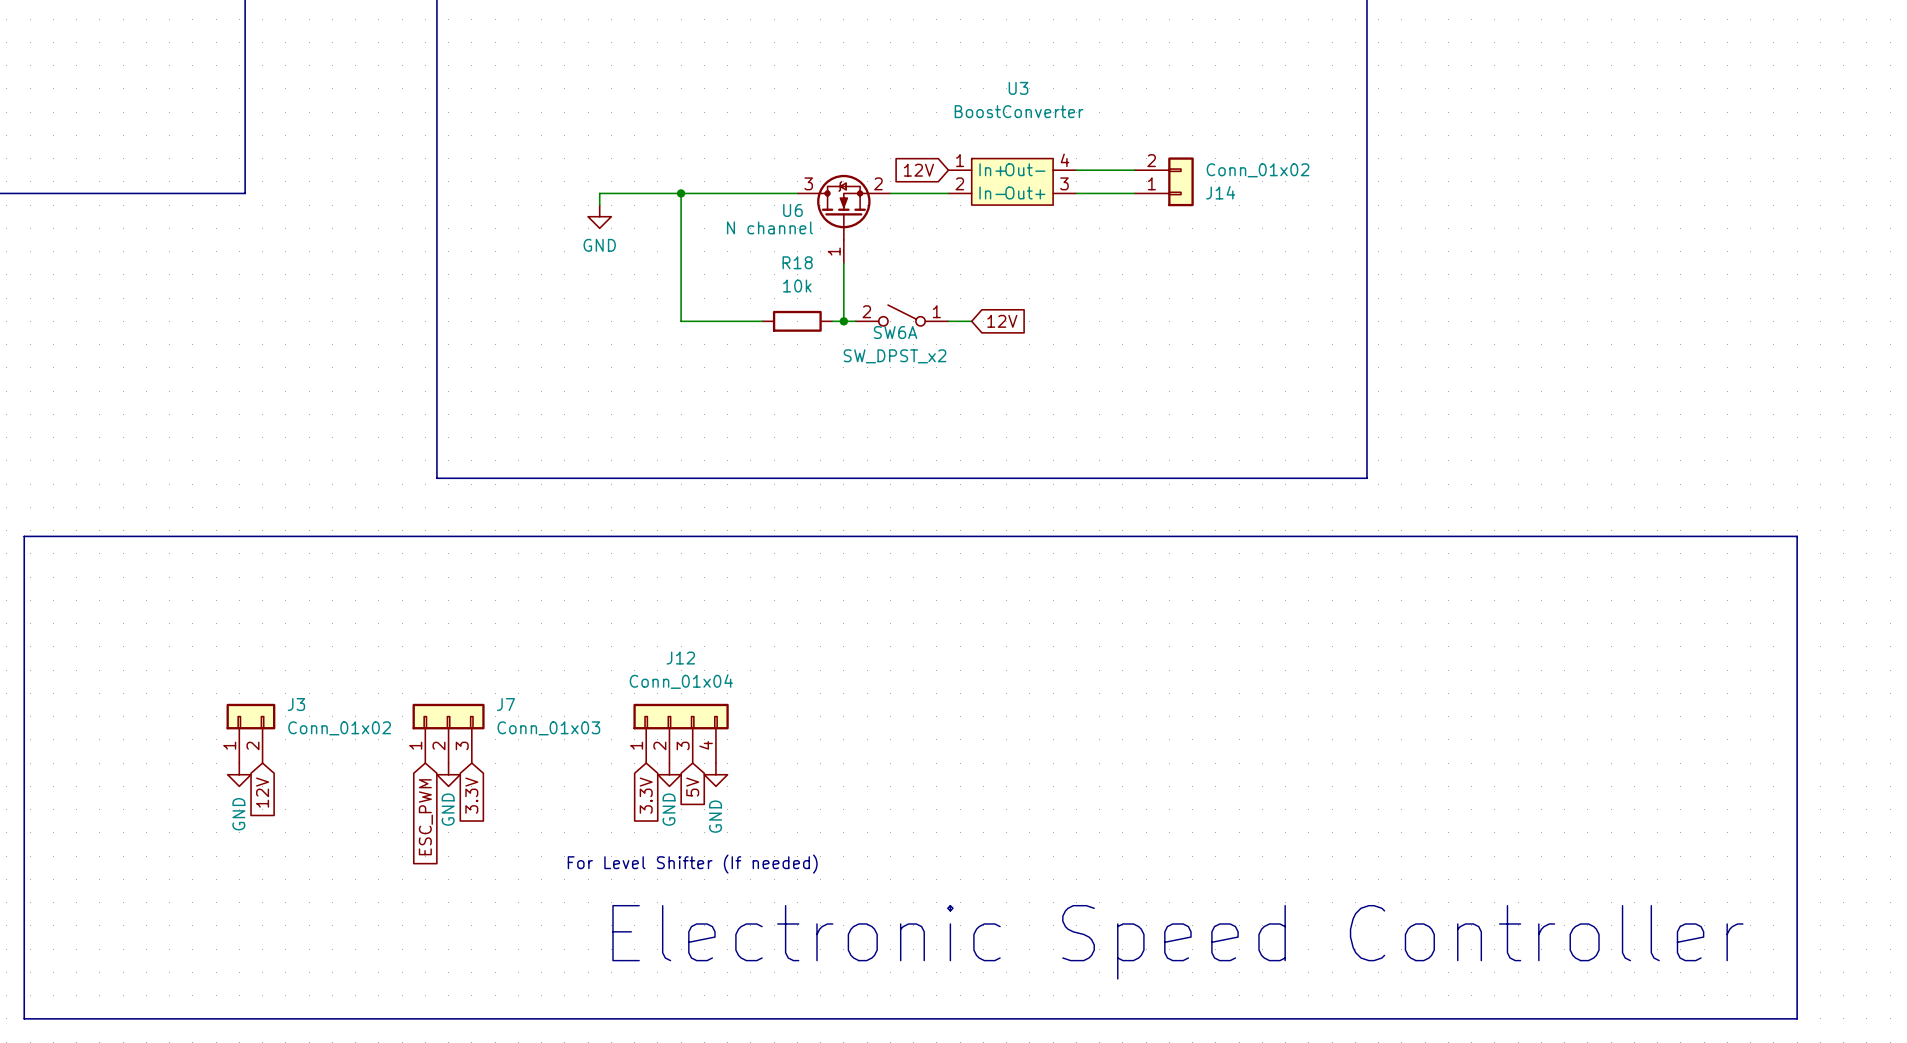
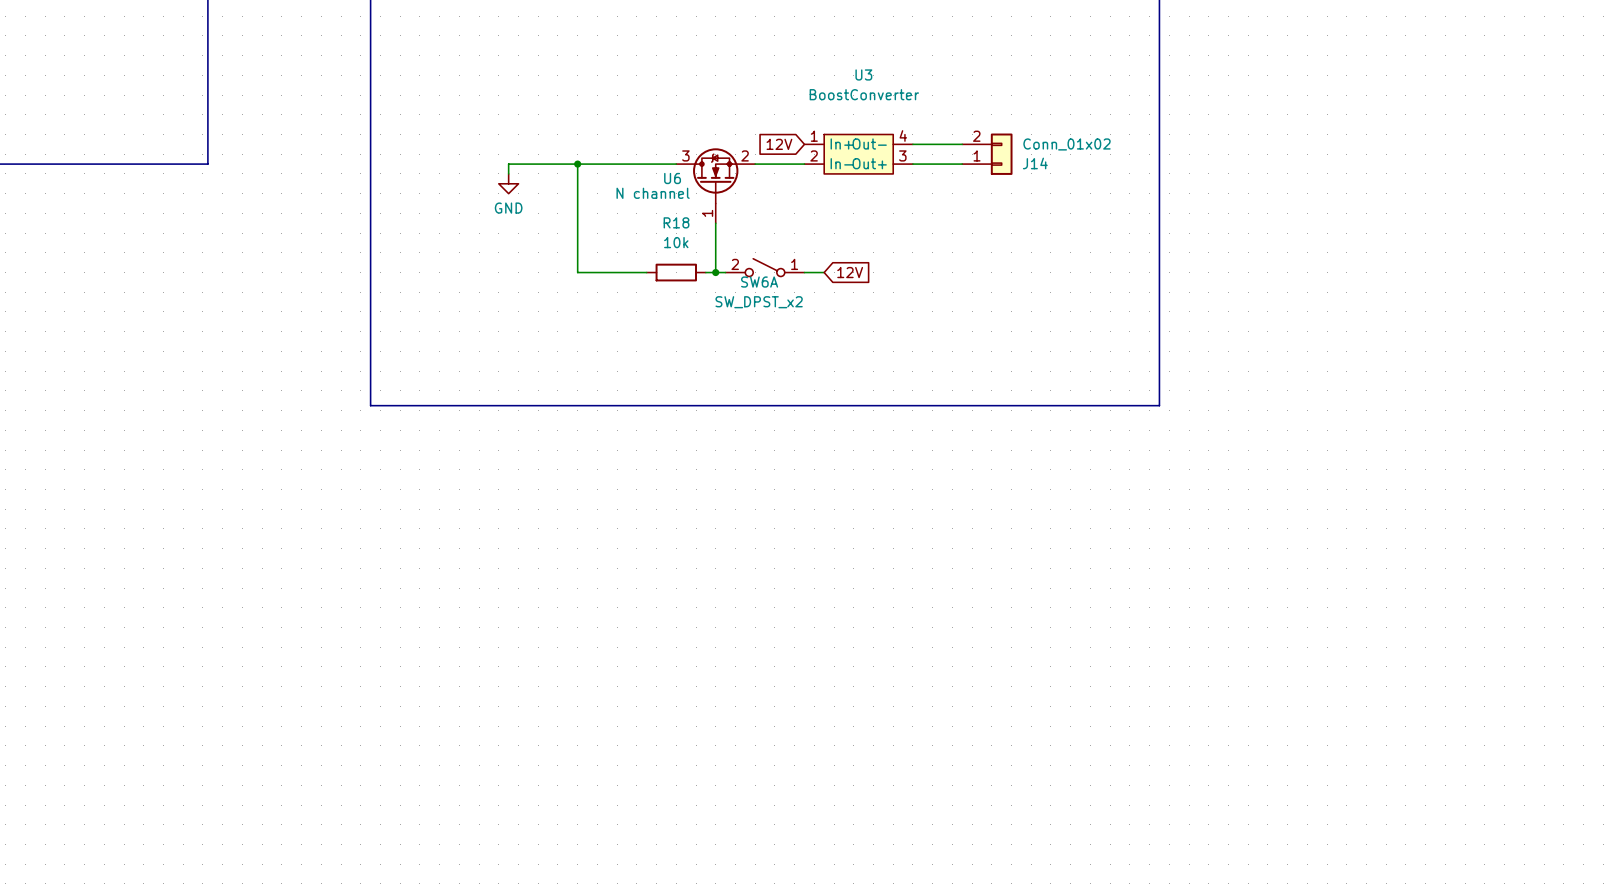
line: (24, 536) (1797, 536) (1797, 1018) (24, 1018) (24, 536) -> none
J3: Conn_01x02 (250, 733) -> none
J7: Conn_01x03 (448, 733) -> none
J12: Conn_01x04 (681, 733) -> none
power symbol: GND (239, 774) -> none
power symbol: GND (448, 774) -> none
power symbol: GND (669, 774) -> none
power symbol: GND (715, 774) -> none
global label: 5V (692, 787) -> none
global label: 12V (262, 792) -> none
global label: 3.3V (471, 795) -> none
global label: 3.3V (646, 795) -> none
global label: ESC_PWM (425, 817) -> none
text: For Level Shifter (If needed) (692, 864) -> none
text: Electronic Speed Controller (1177, 942) -> none

